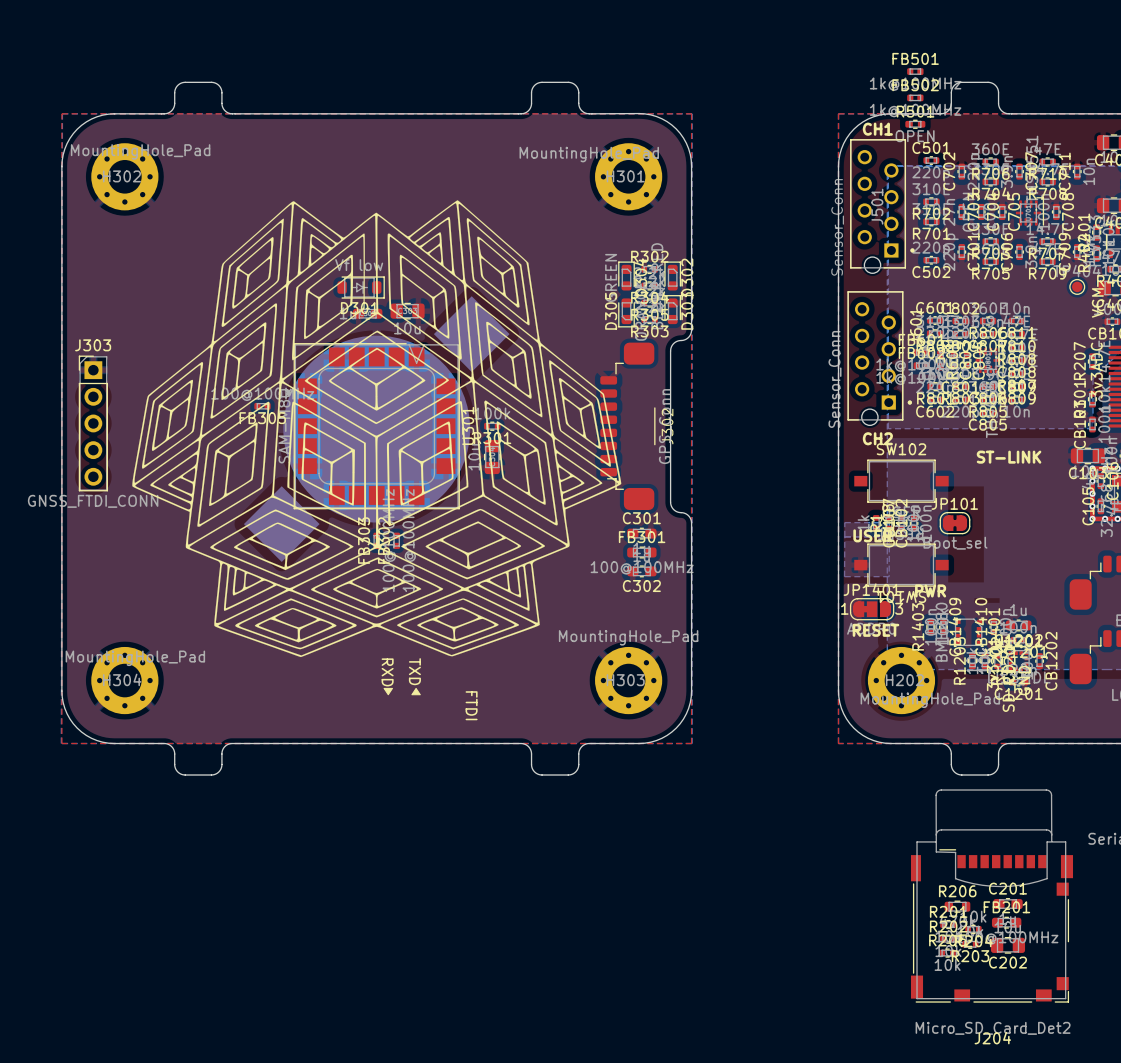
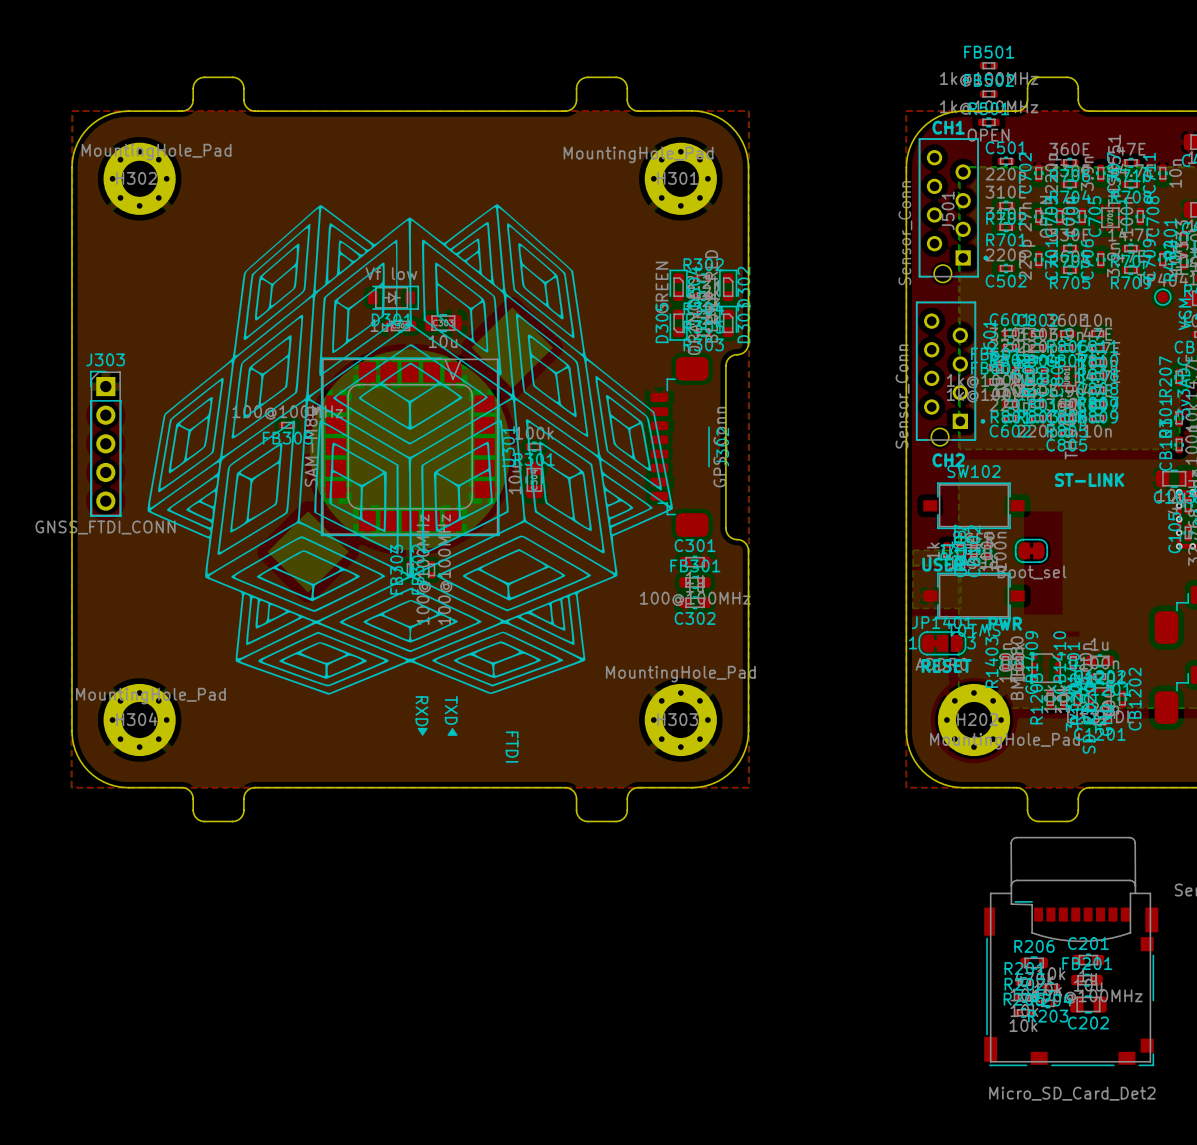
JP101 name: JP101 (954, 503) -> none
J204 name: J204 (992, 1038) -> none

